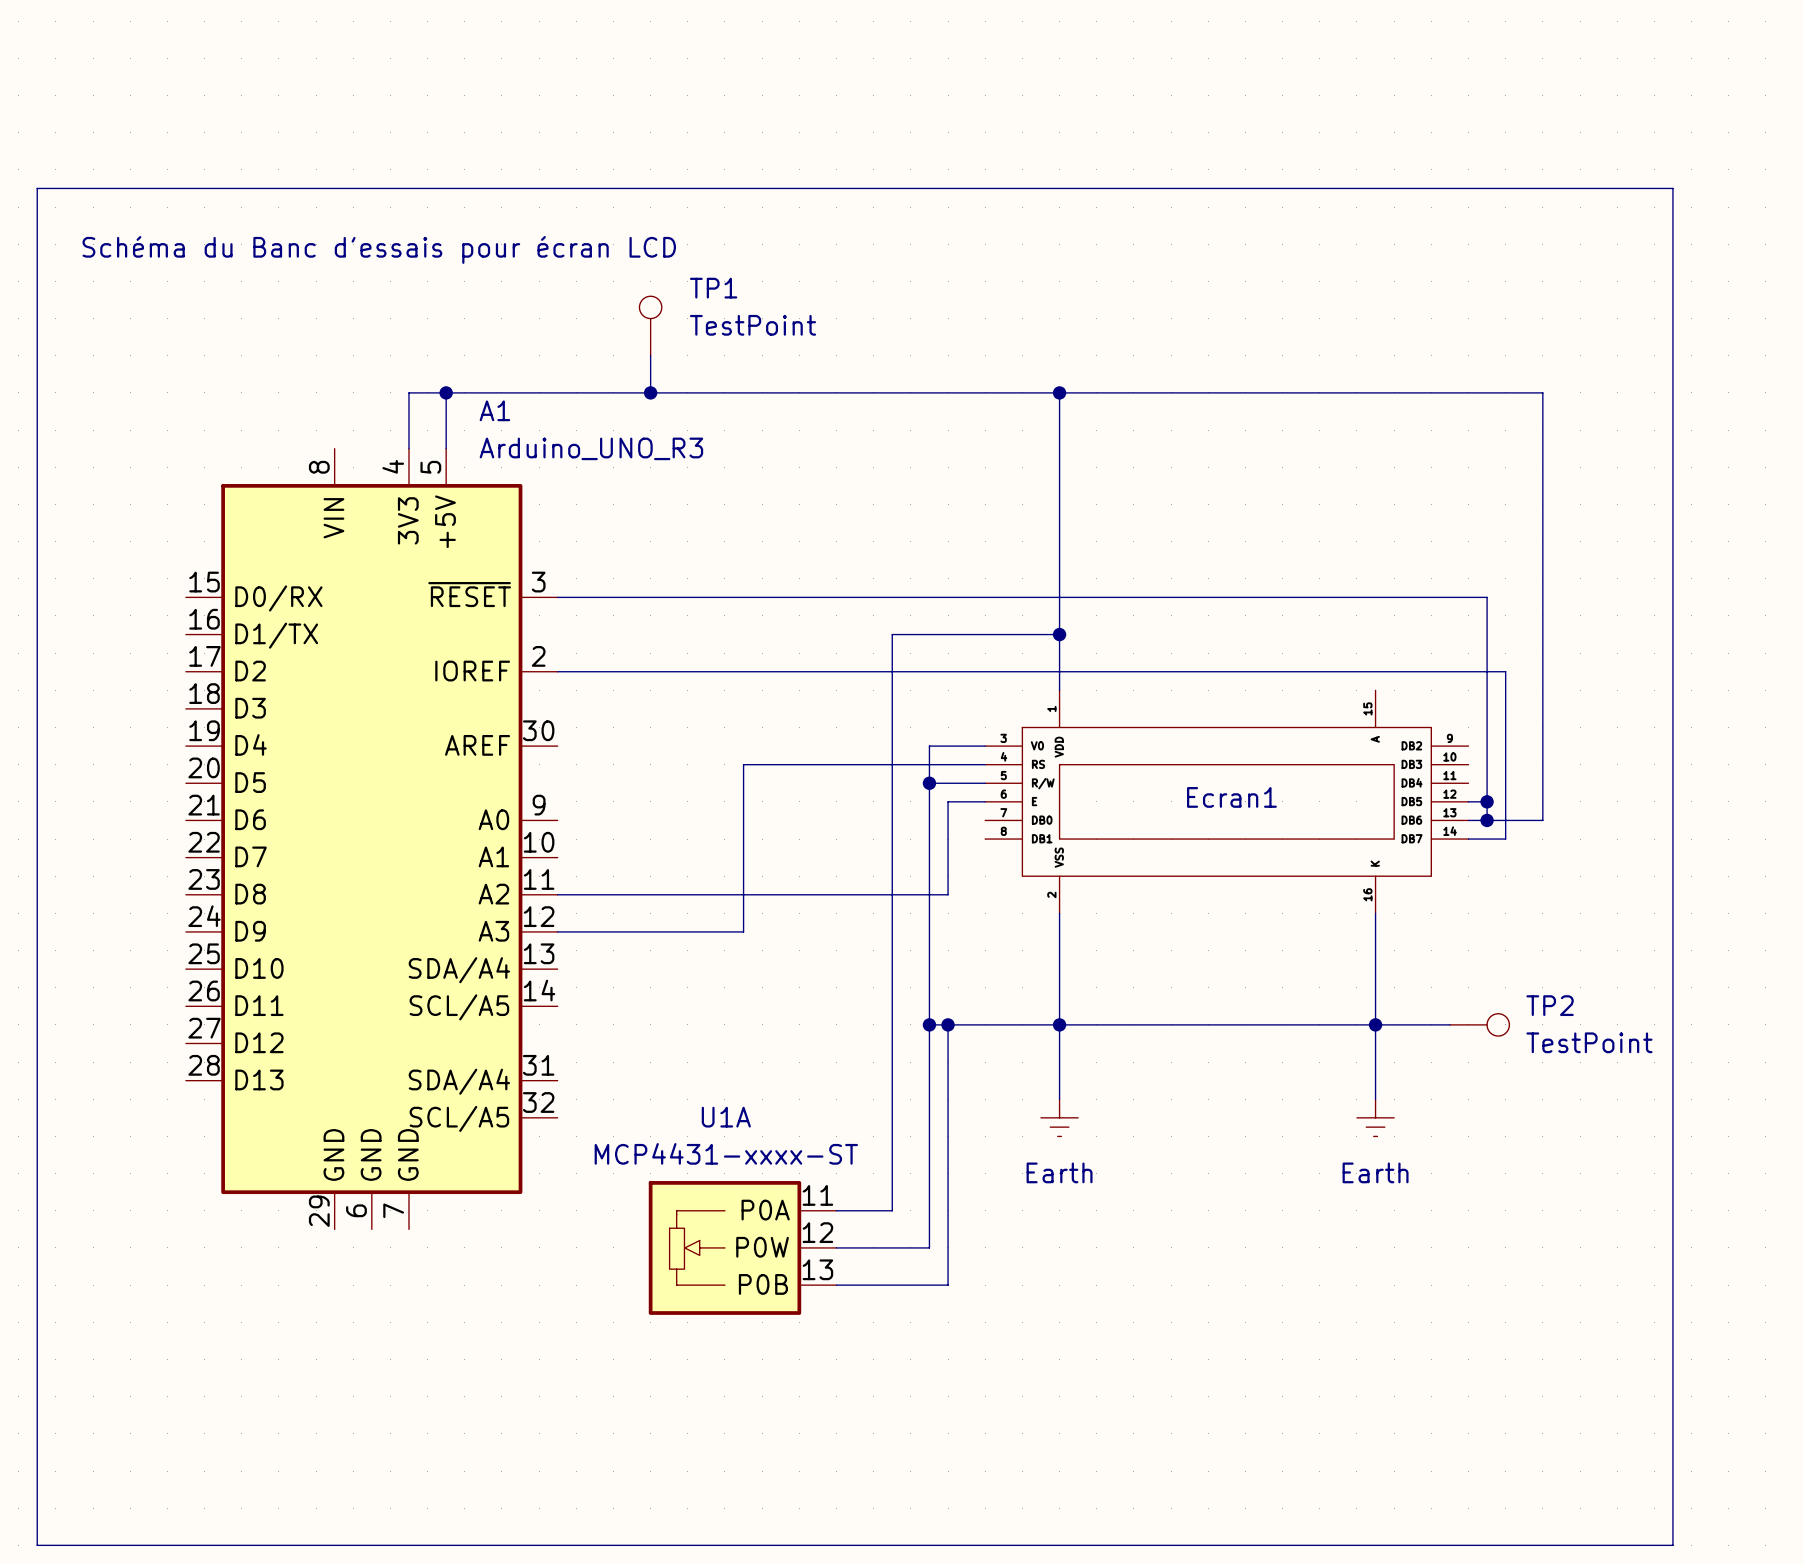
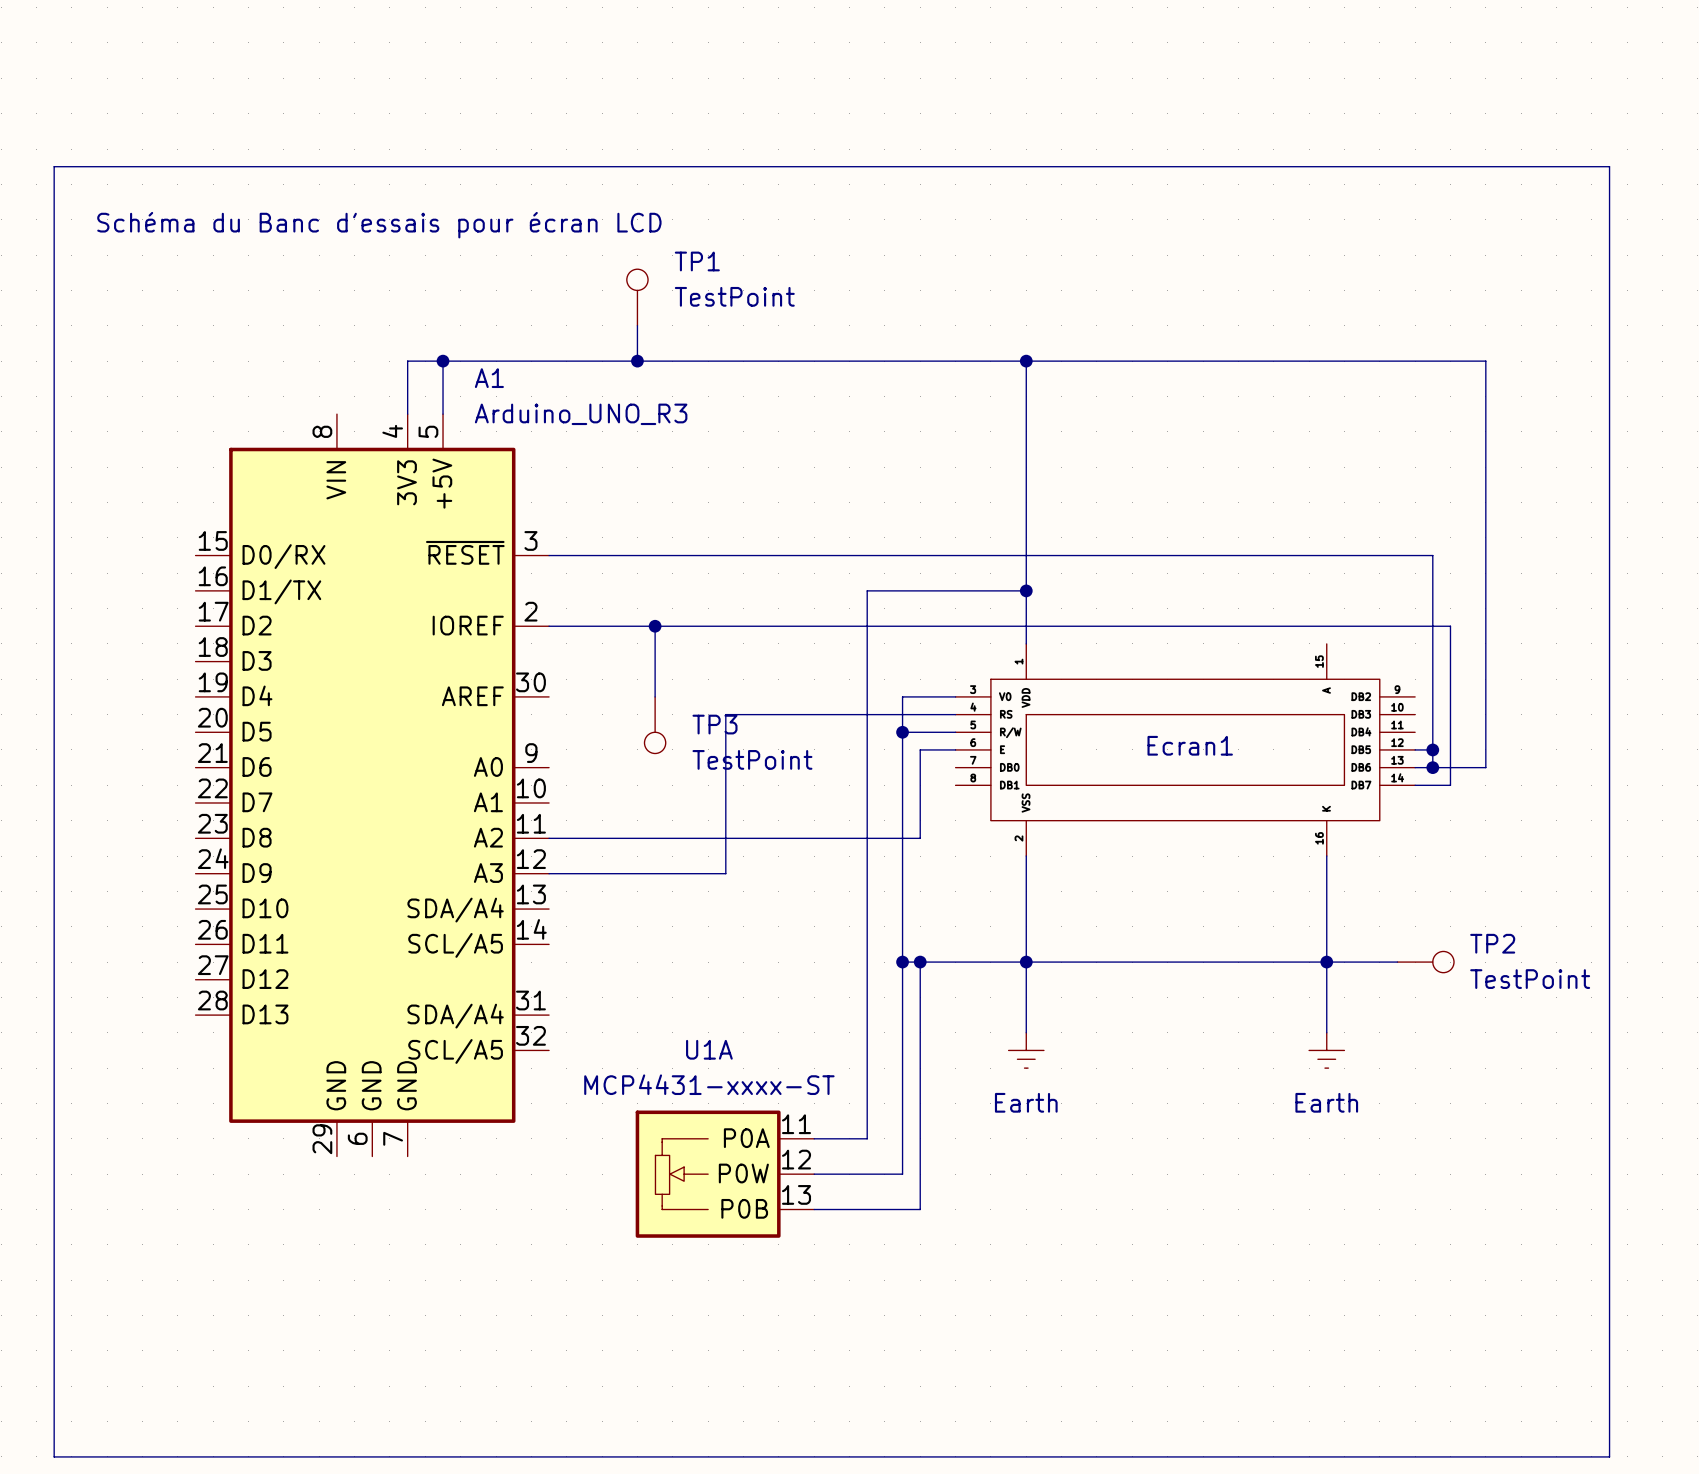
wire: none -> (655, 626) (655, 696)
junction: none -> (655, 626)
TP3: none -> TestPoint (655, 725)

